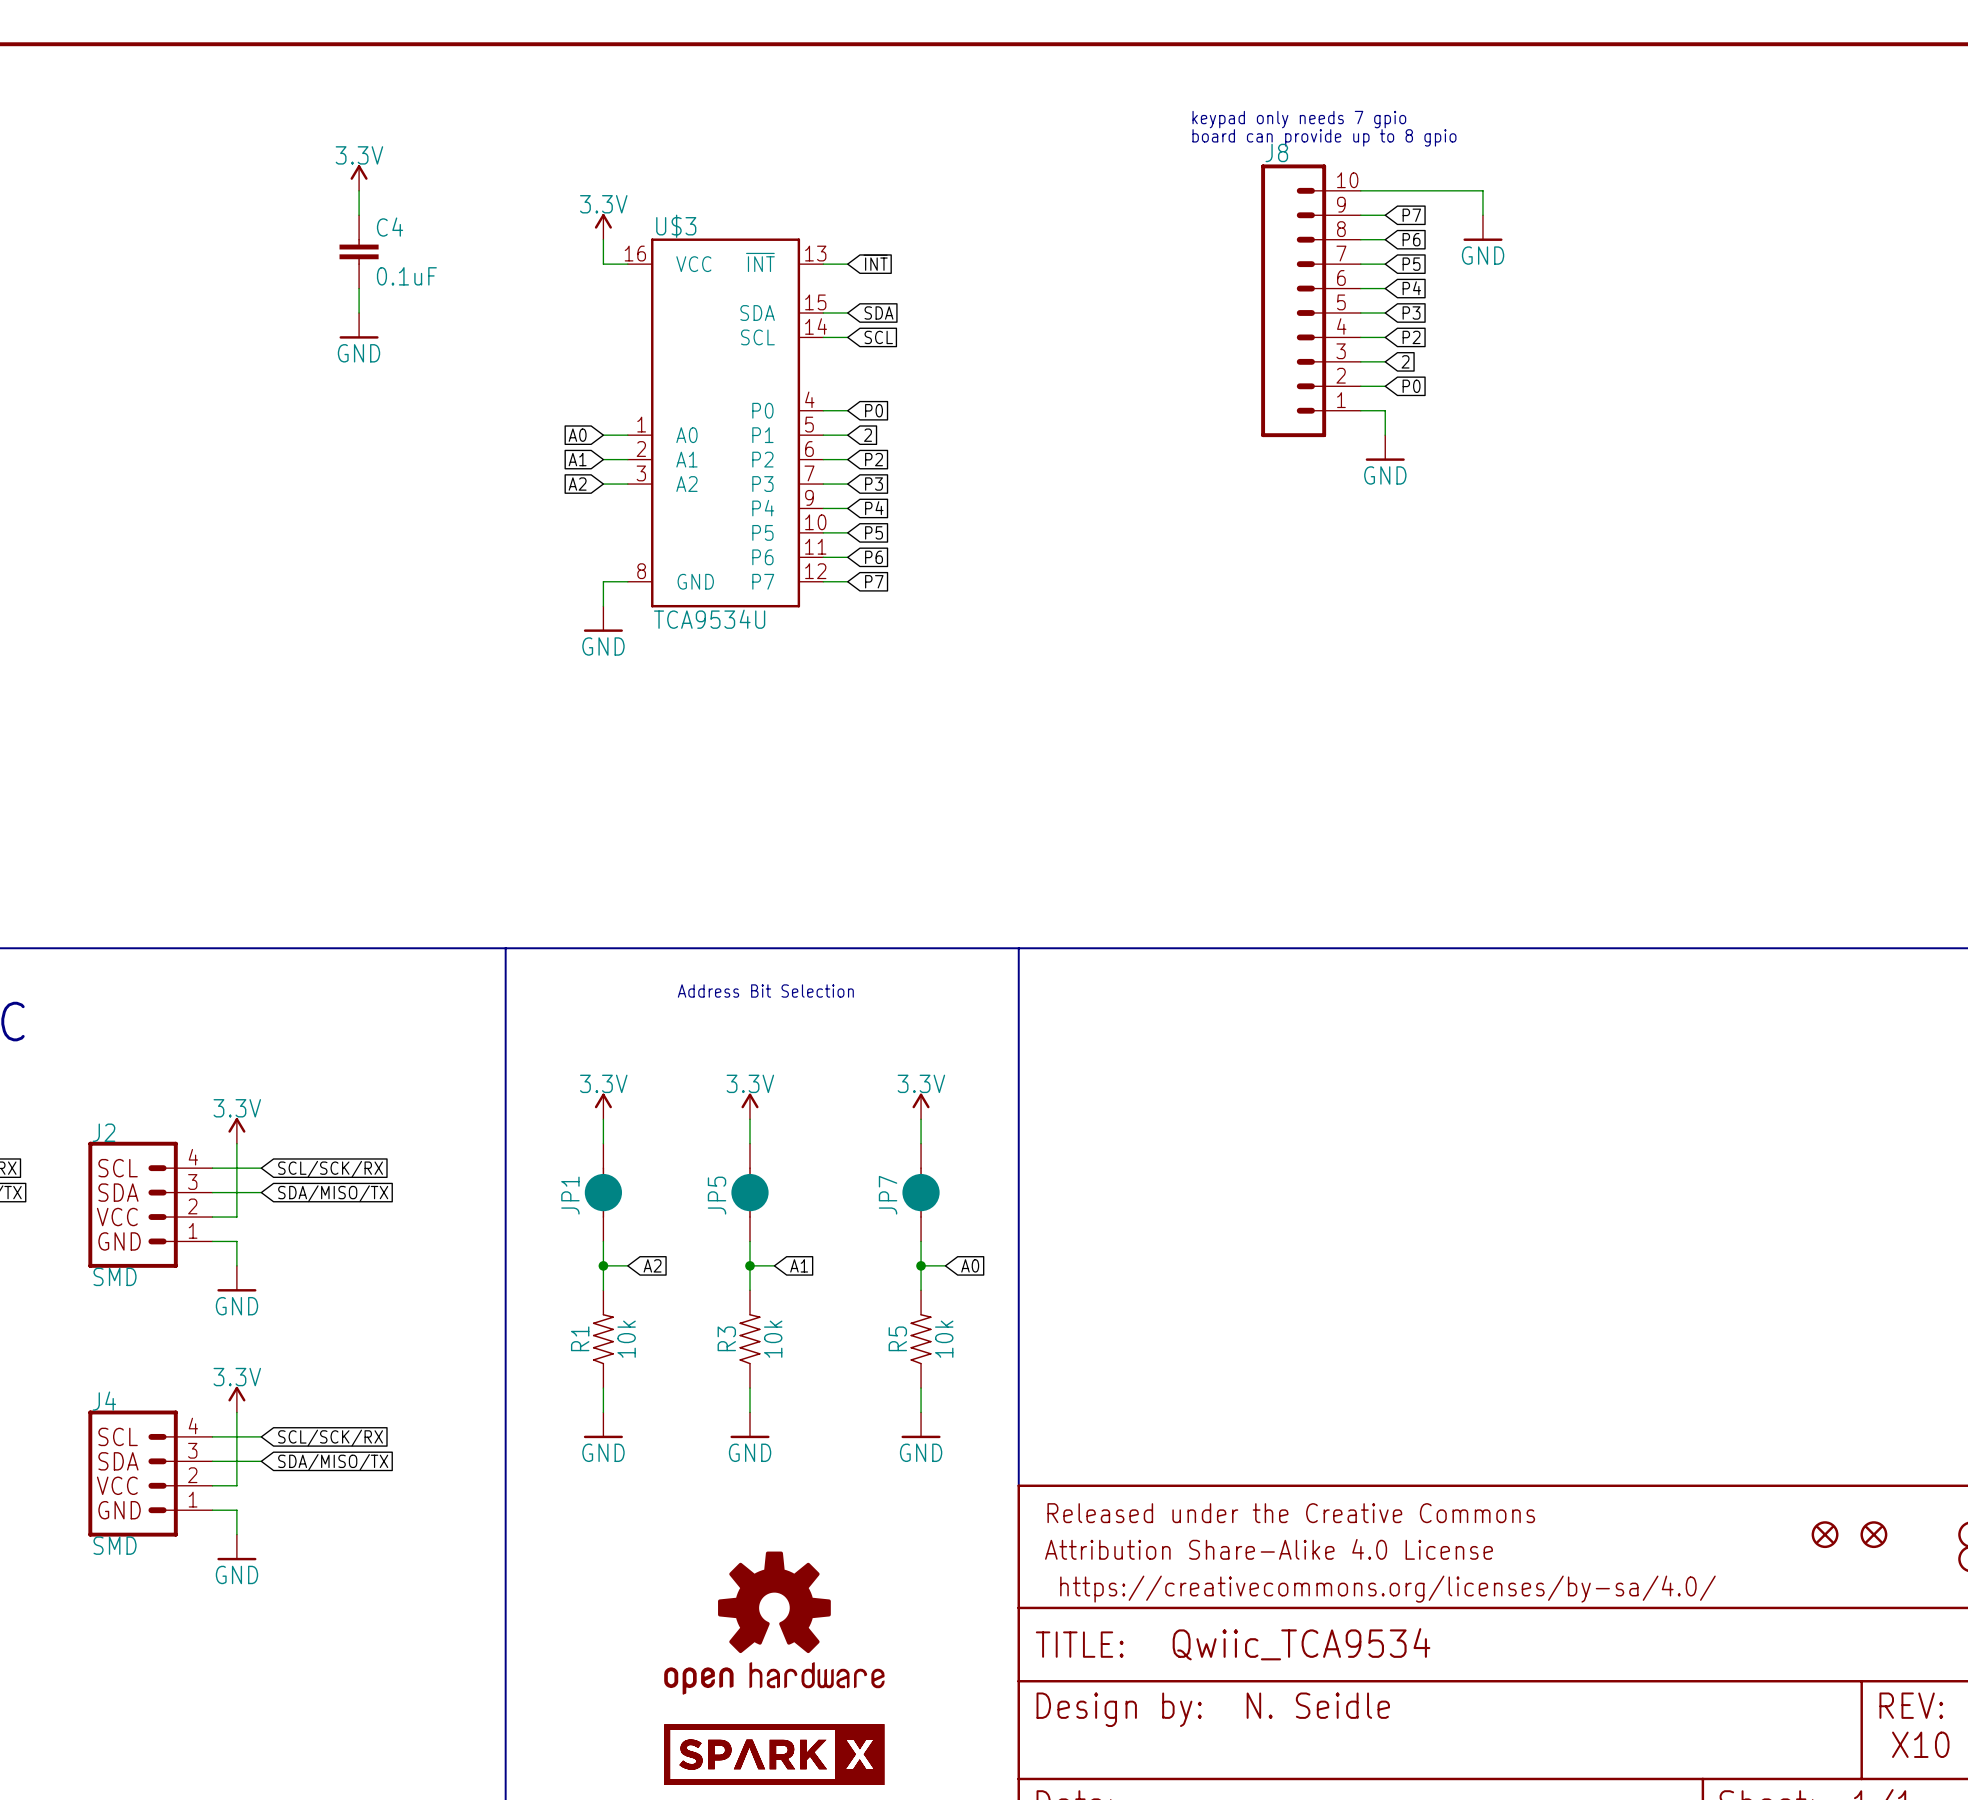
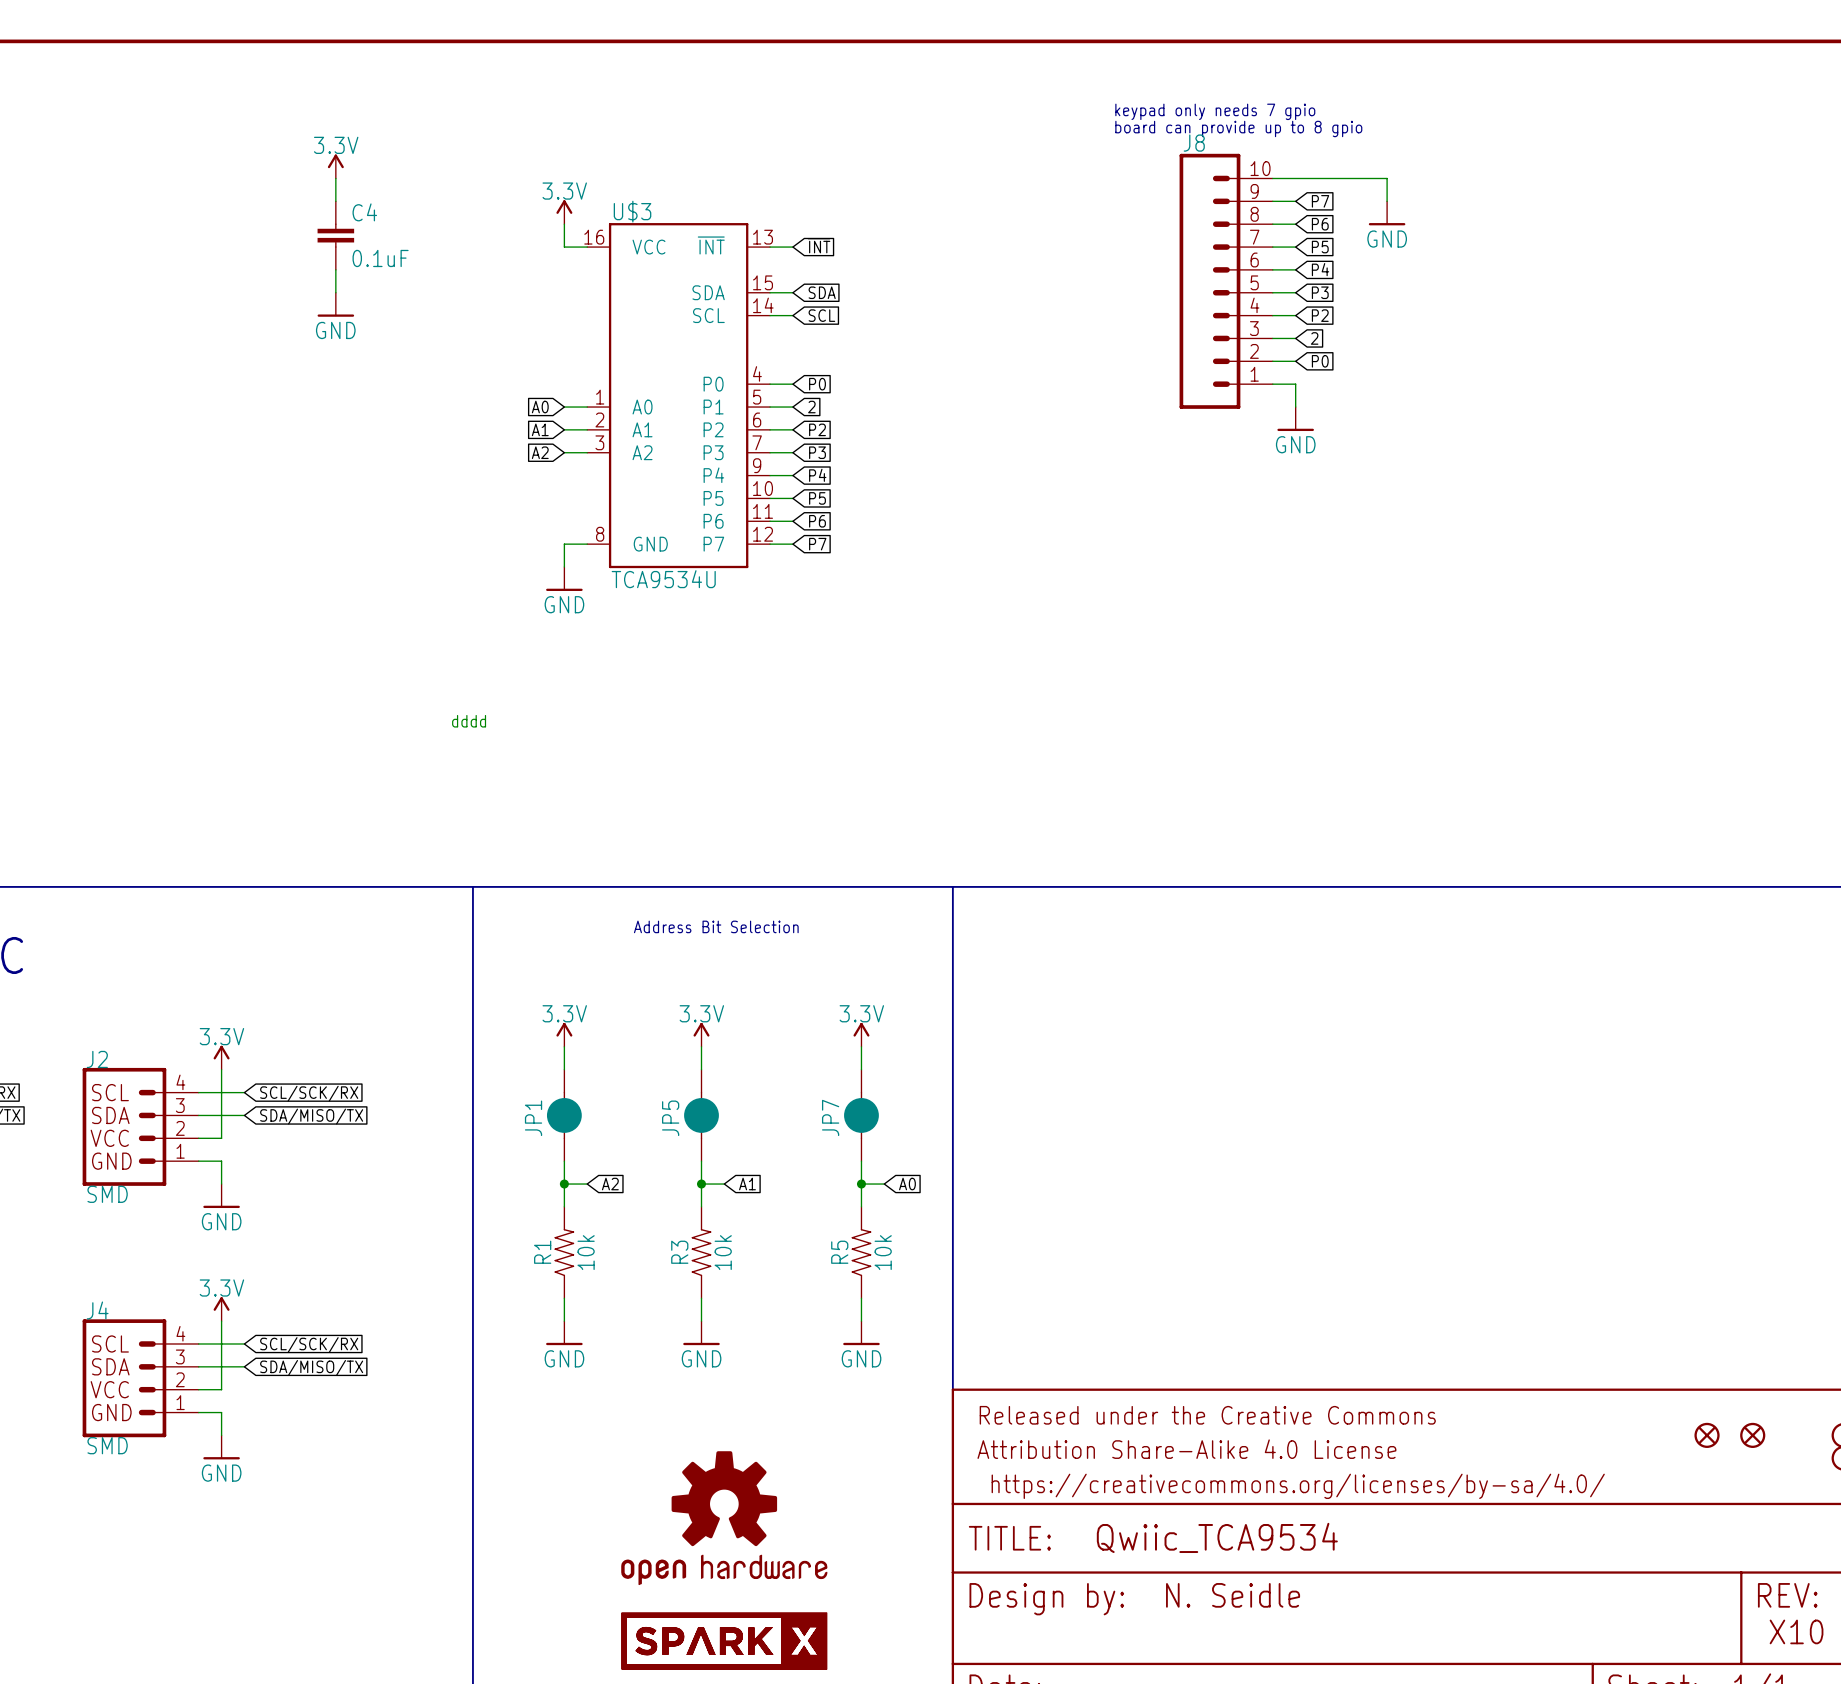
text: none -> dddd (469, 721)

